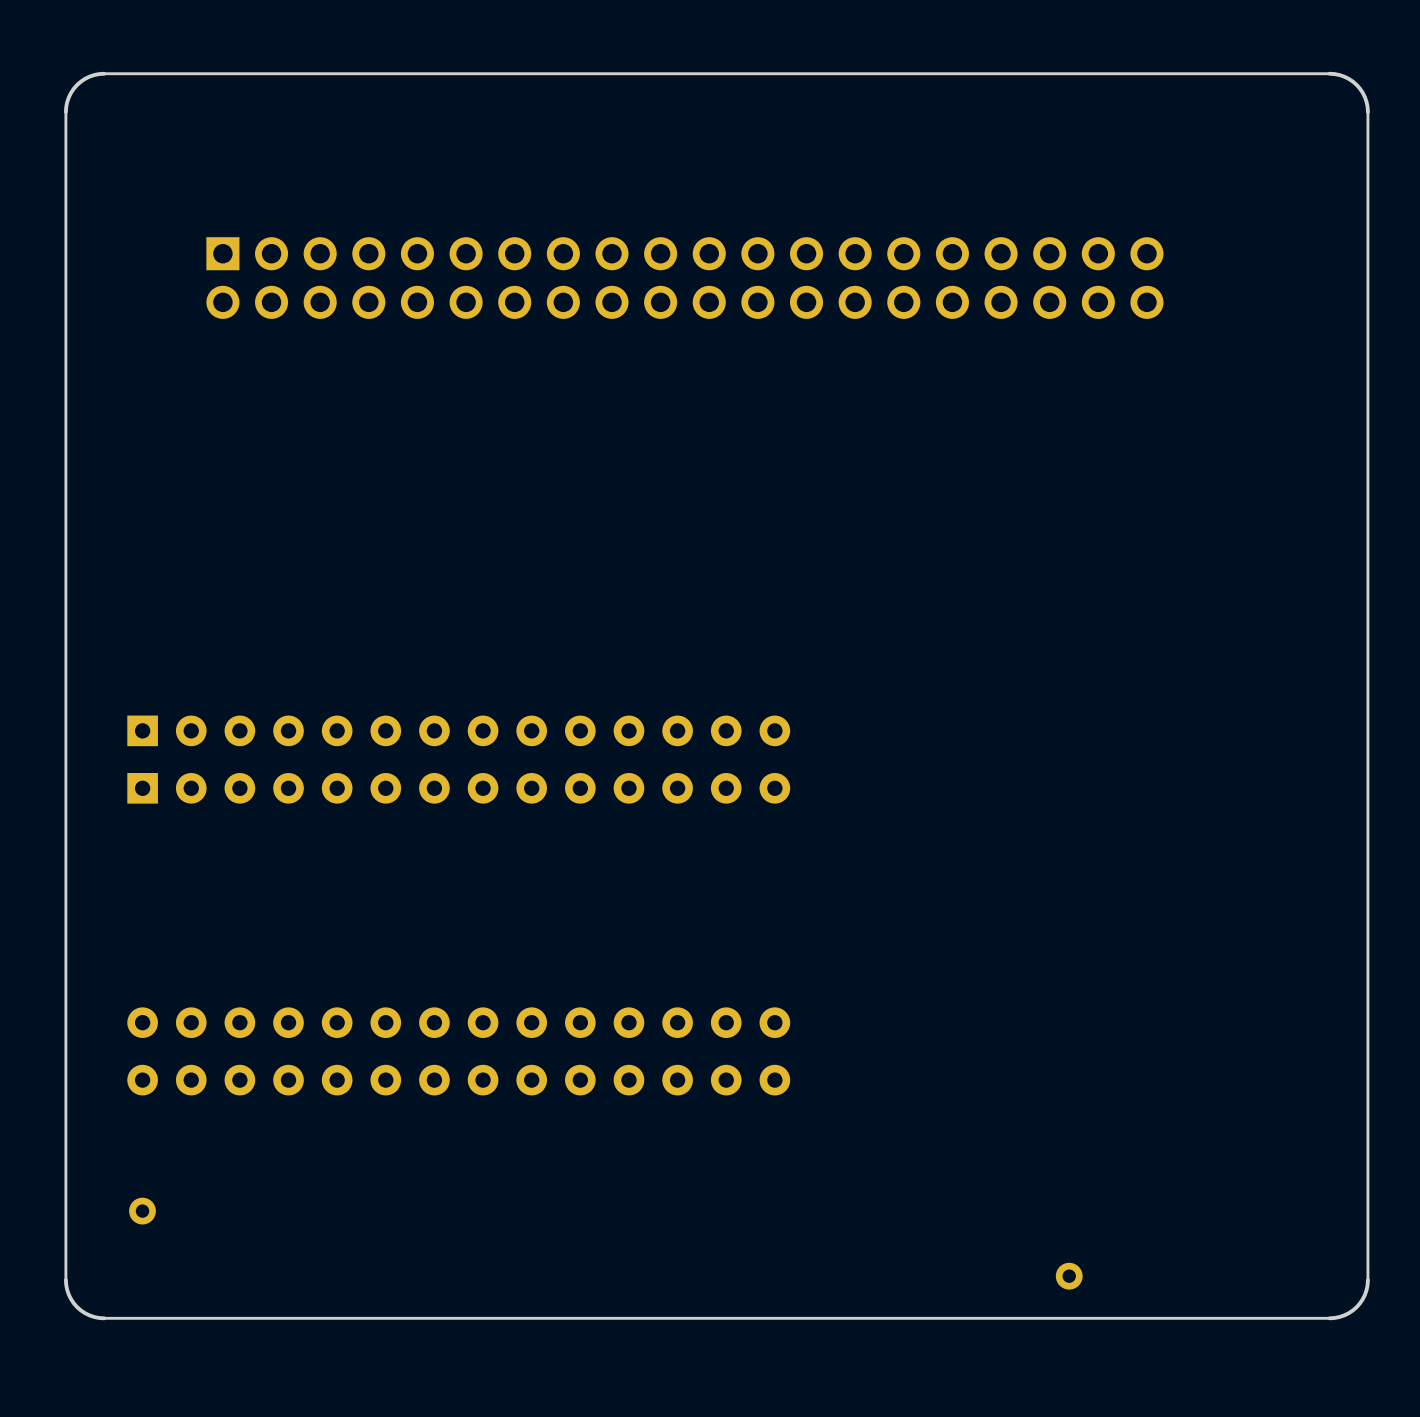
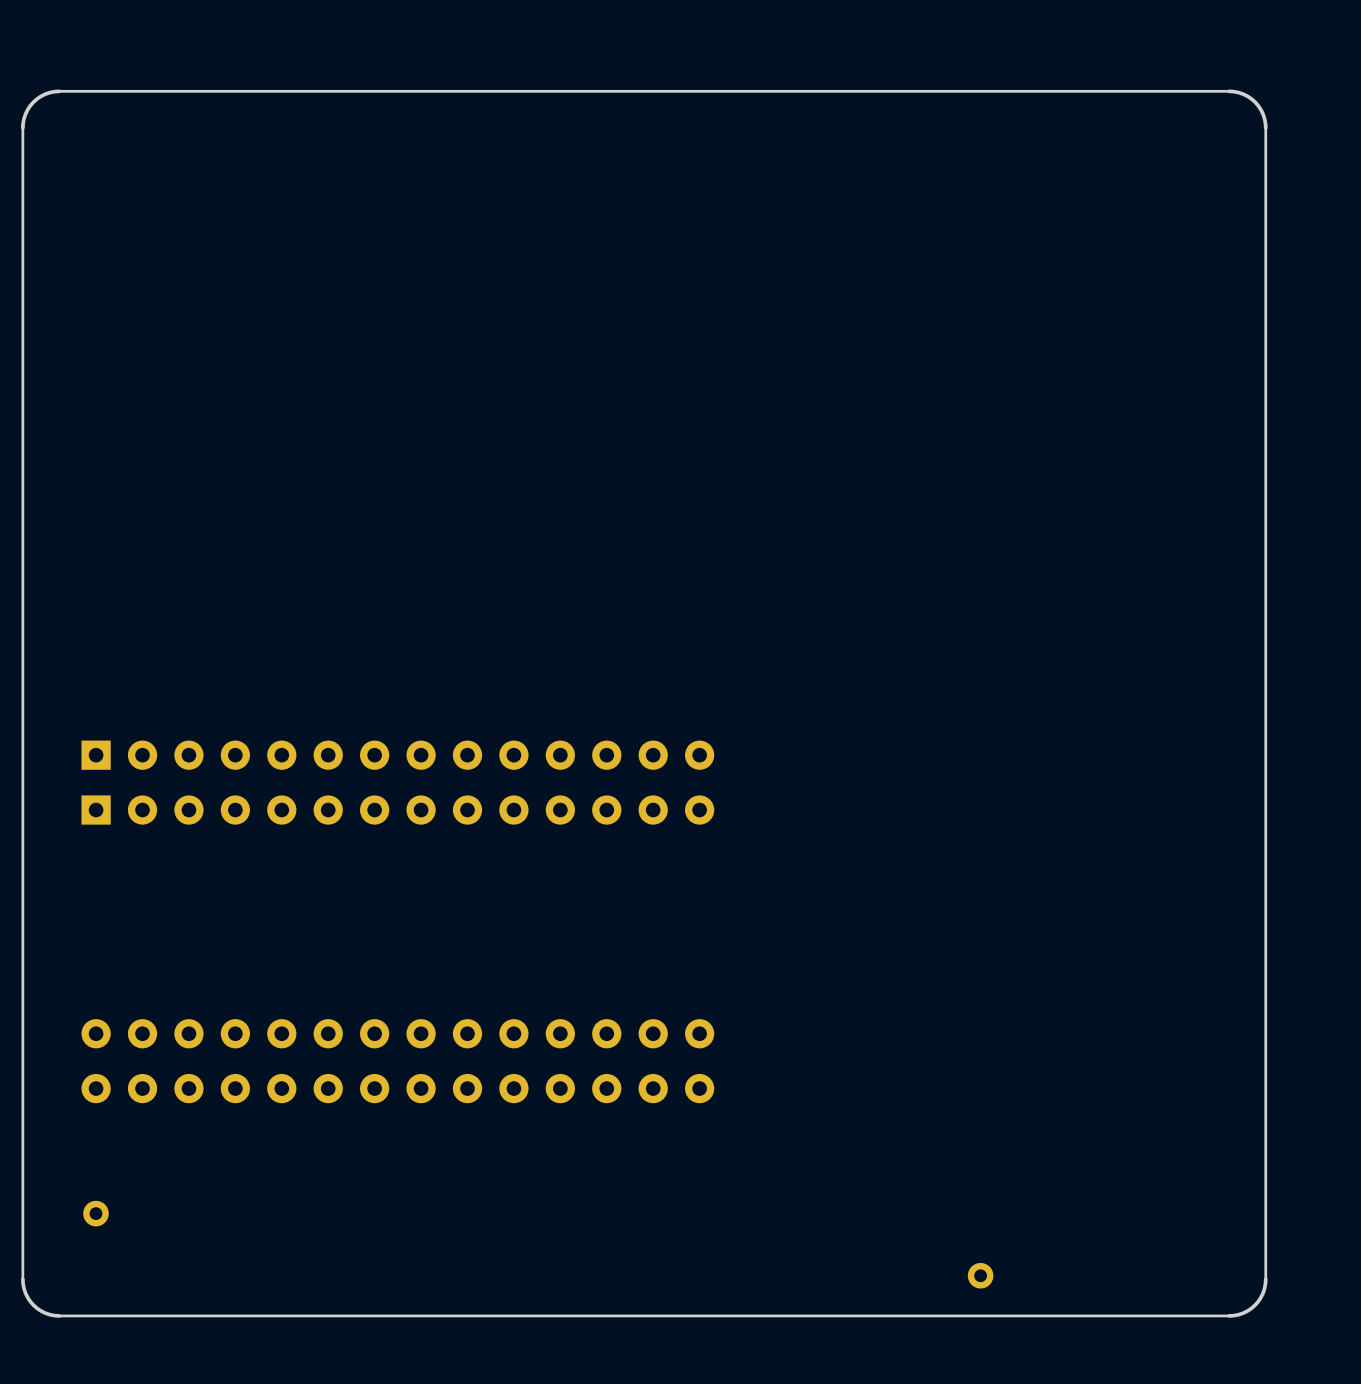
board edge: none -> (22, 124) (22, 164)
board edge: none -> (1265, 127) (1262, 113) (1255, 102) (1243, 94) (1229, 91) (59, 91) (45, 94) (33, 102) (25, 113) (22, 127)
board edge: (1367, 112) (1365, 97) (1356, 84) (1344, 76) (1329, 73) (104, 73) (89, 76) (77, 84) (68, 97) (65, 112) -> (1265, 164) (1265, 124)
part: (684, 278) -> none

